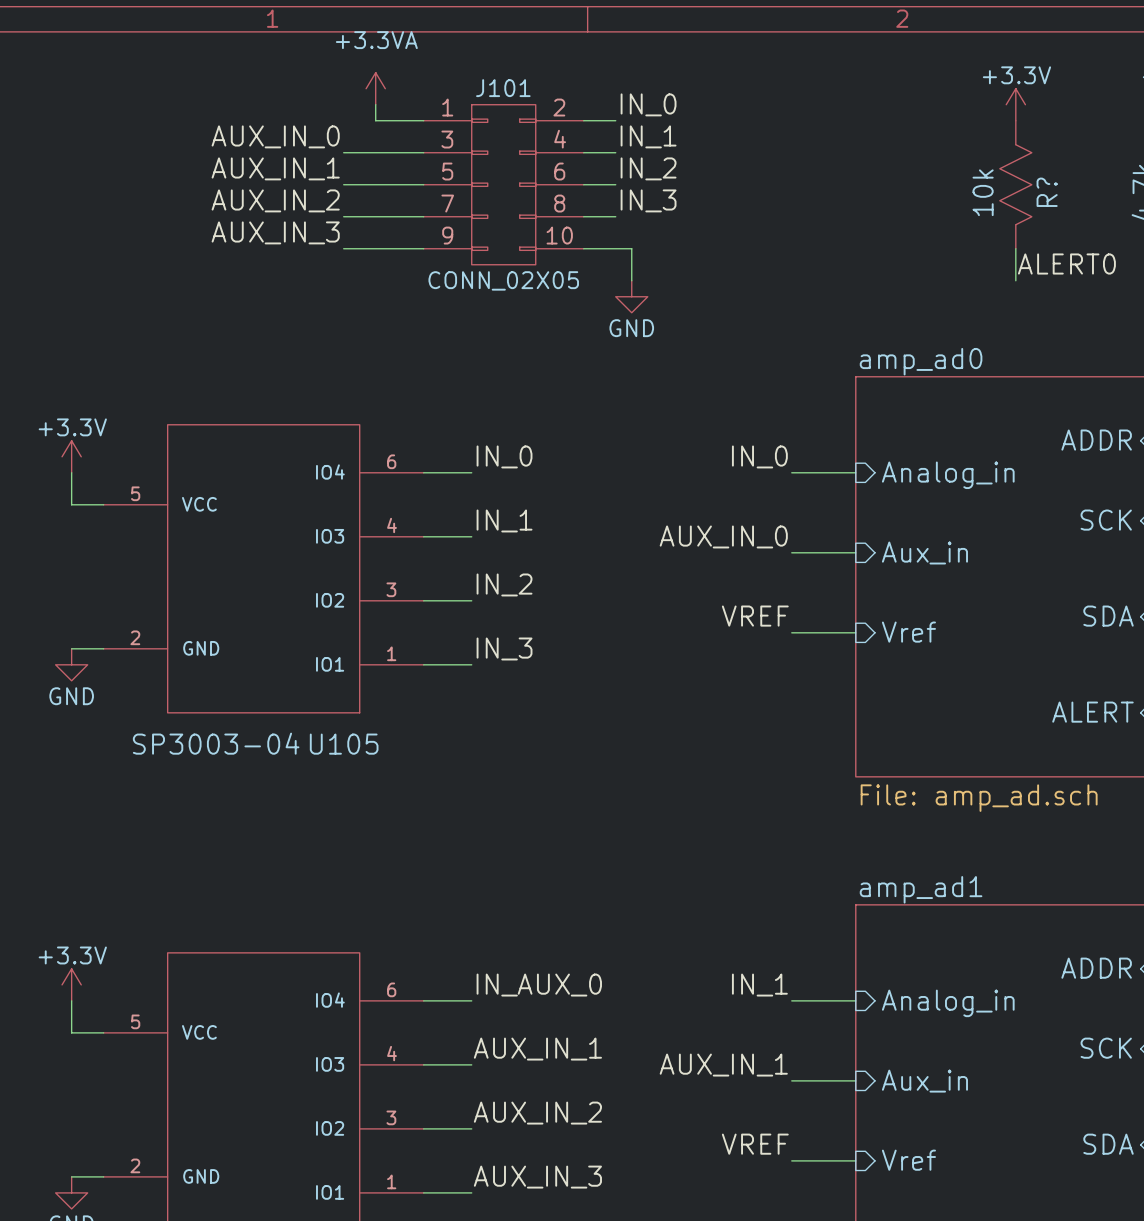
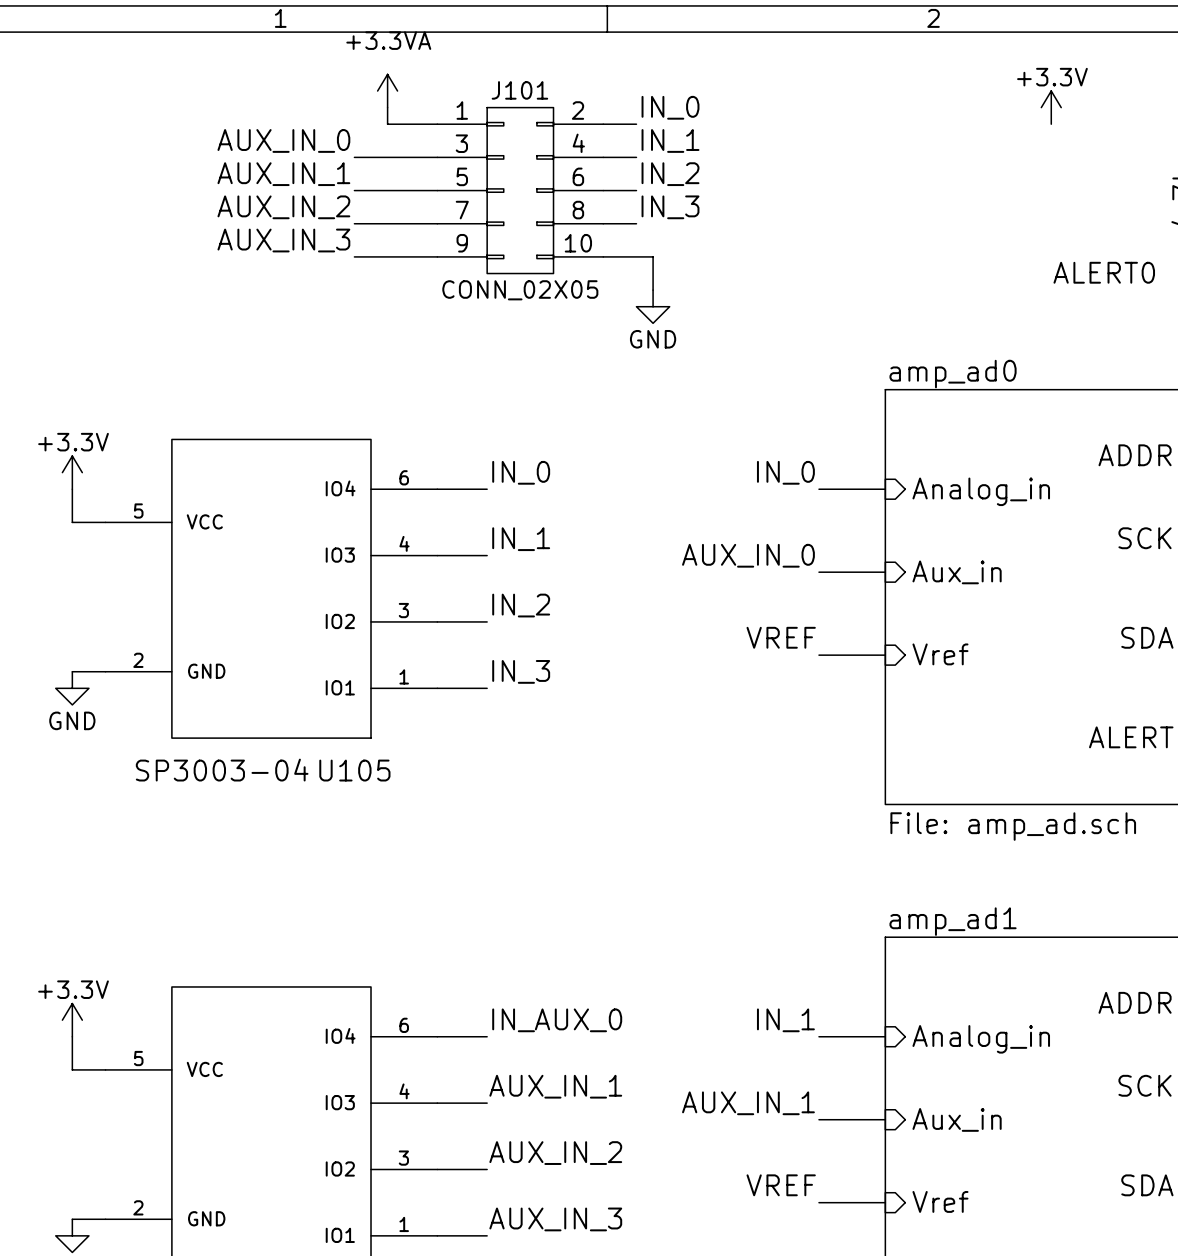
R?: 10k (1015, 184) -> none
wire: (1015, 248) (1015, 280) -> none

